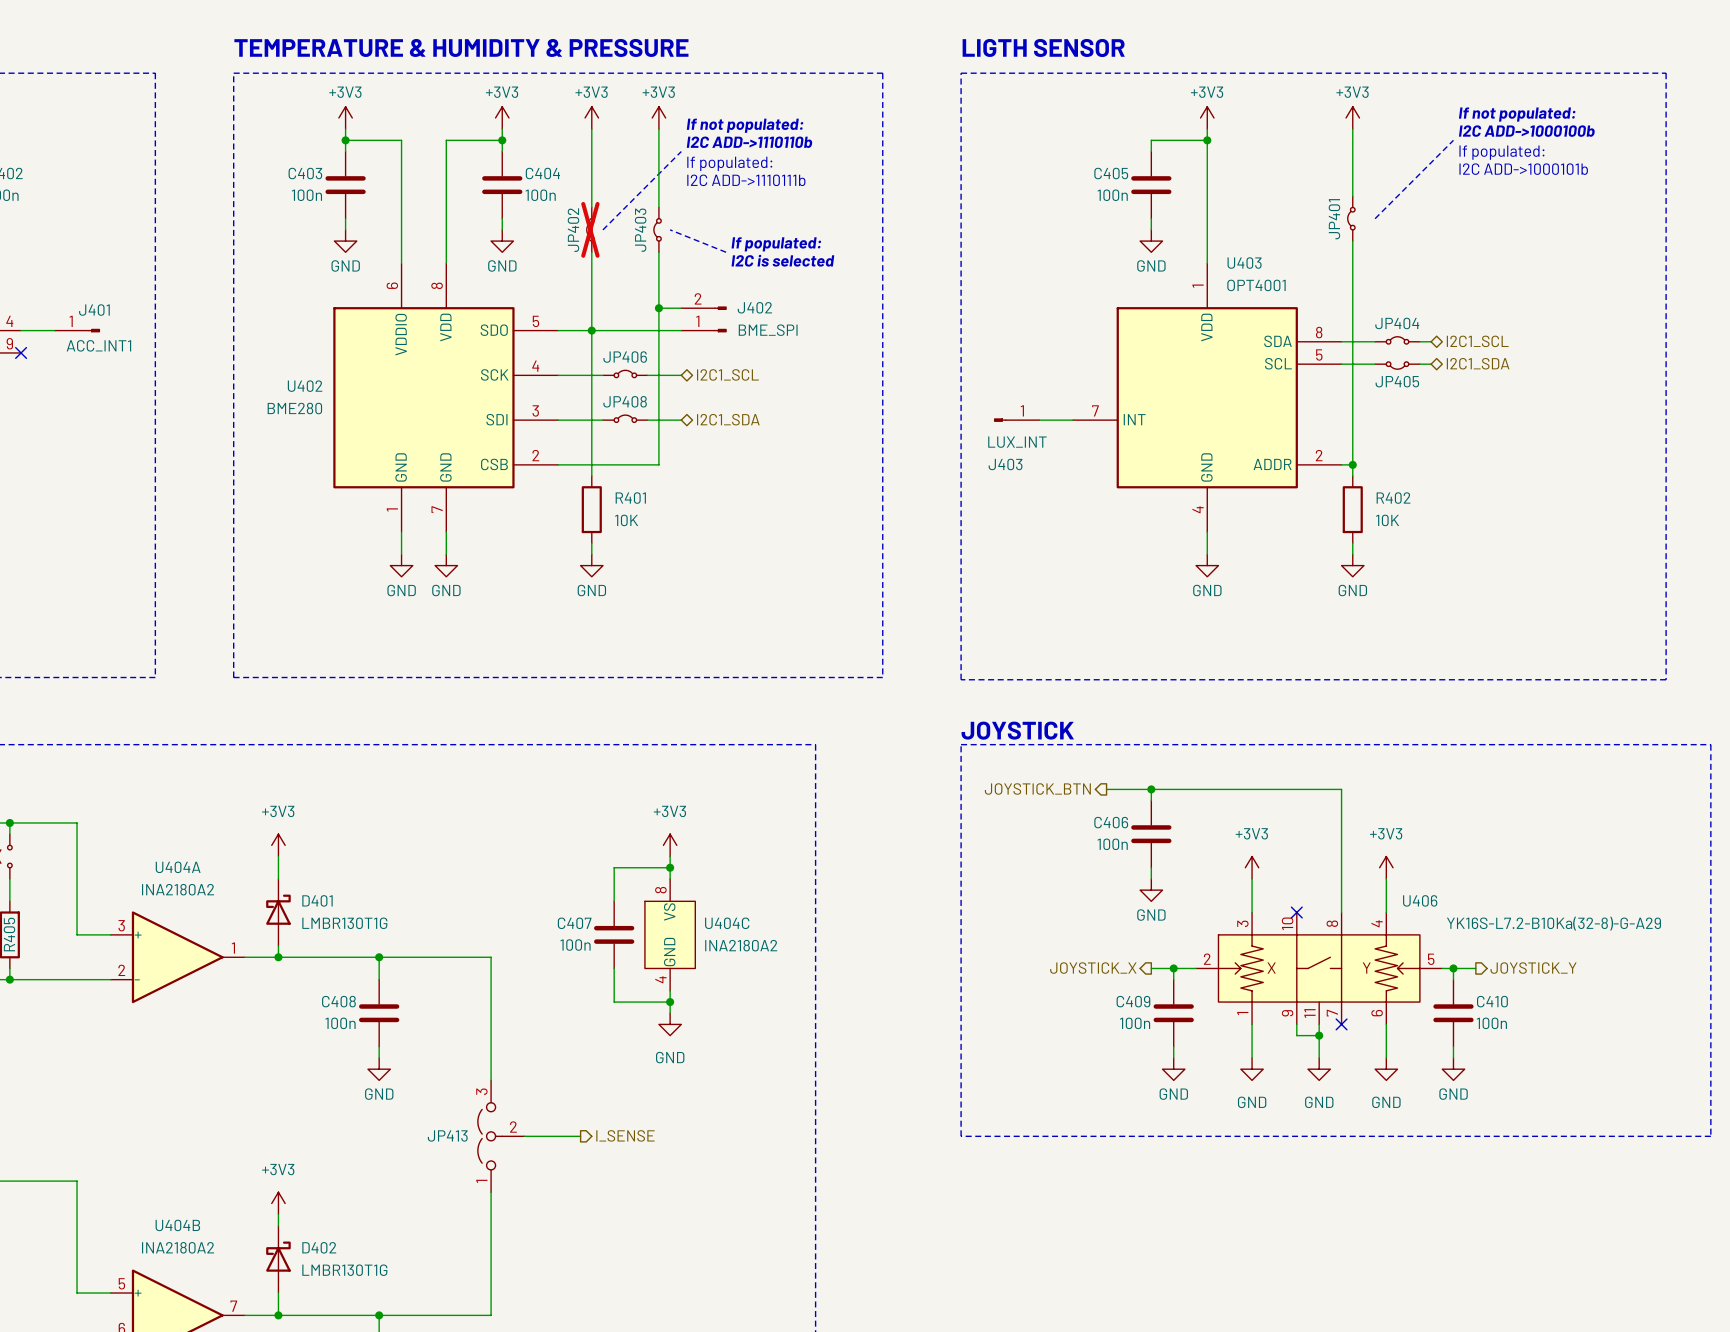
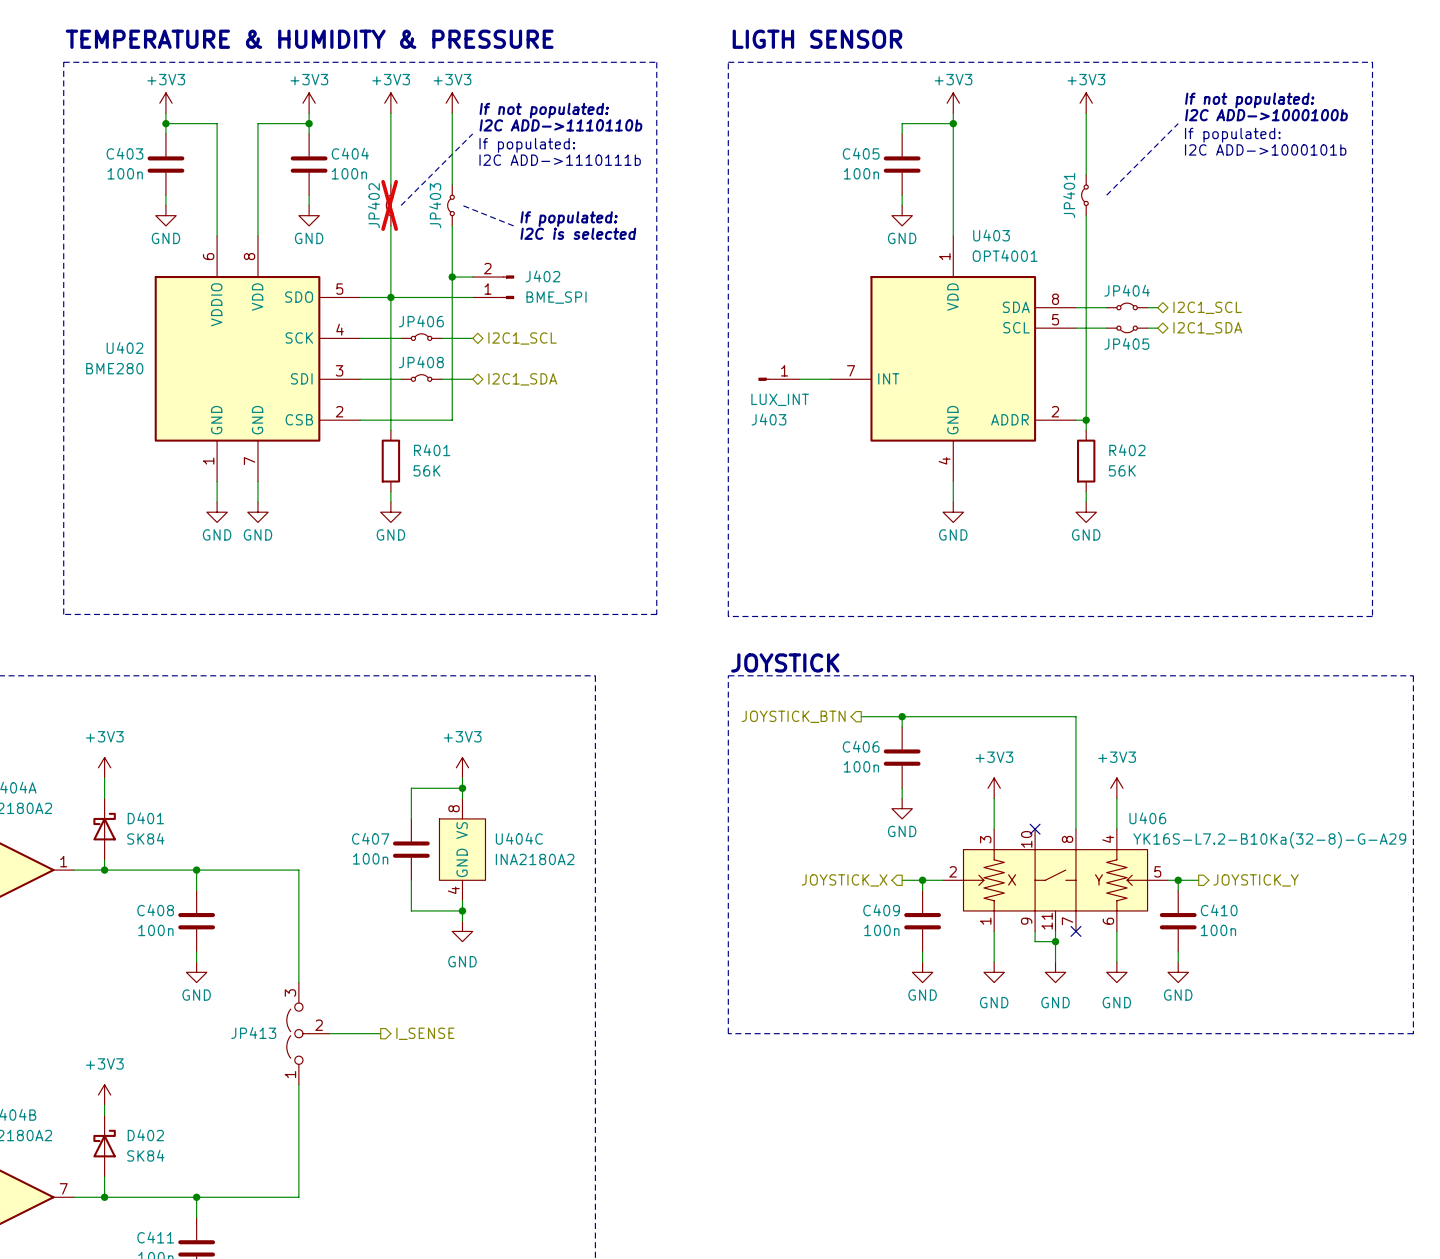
R401 value: 10K (626, 520) -> 56K (427, 470)
R402 value: 10K (1387, 520) -> 56K (1122, 470)
D401 value: LMBR130T1G (344, 923) -> SK84 (145, 838)
D402 value: LMBR130T1G (344, 1270) -> SK84 (145, 1155)

